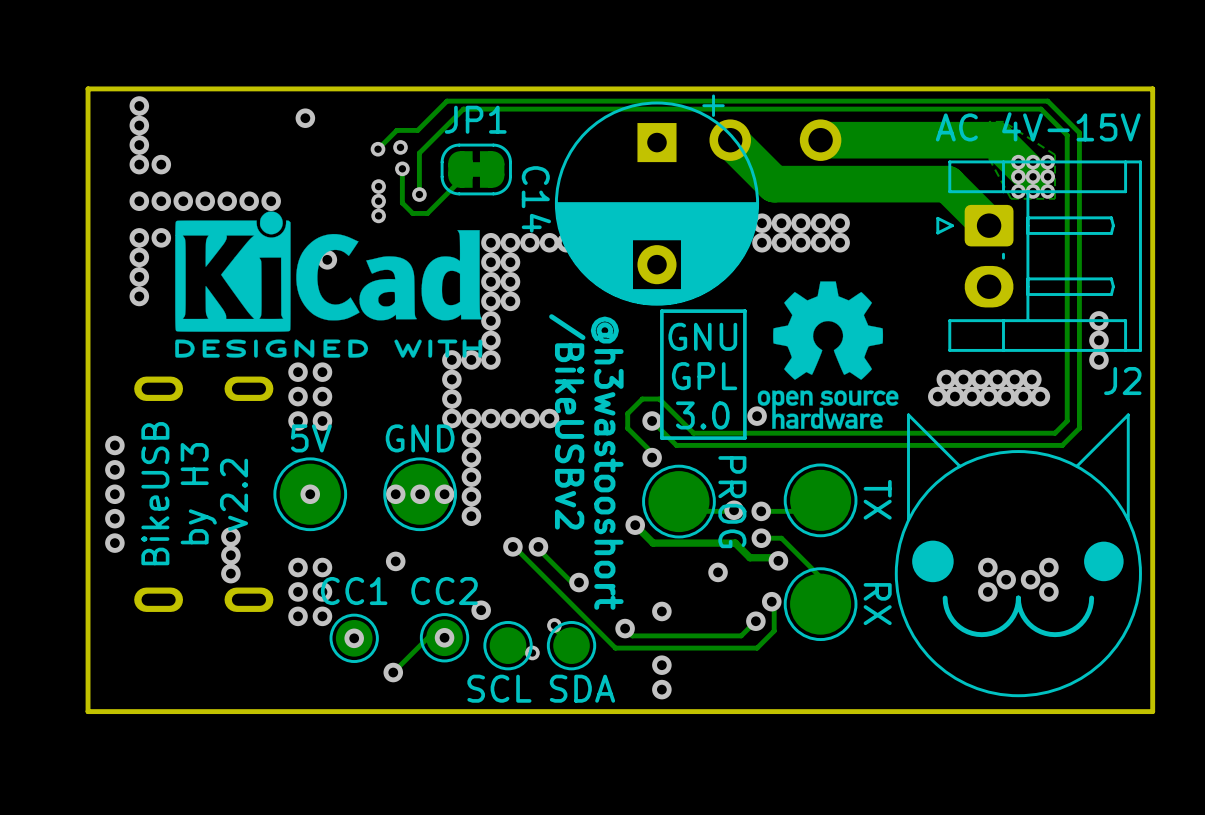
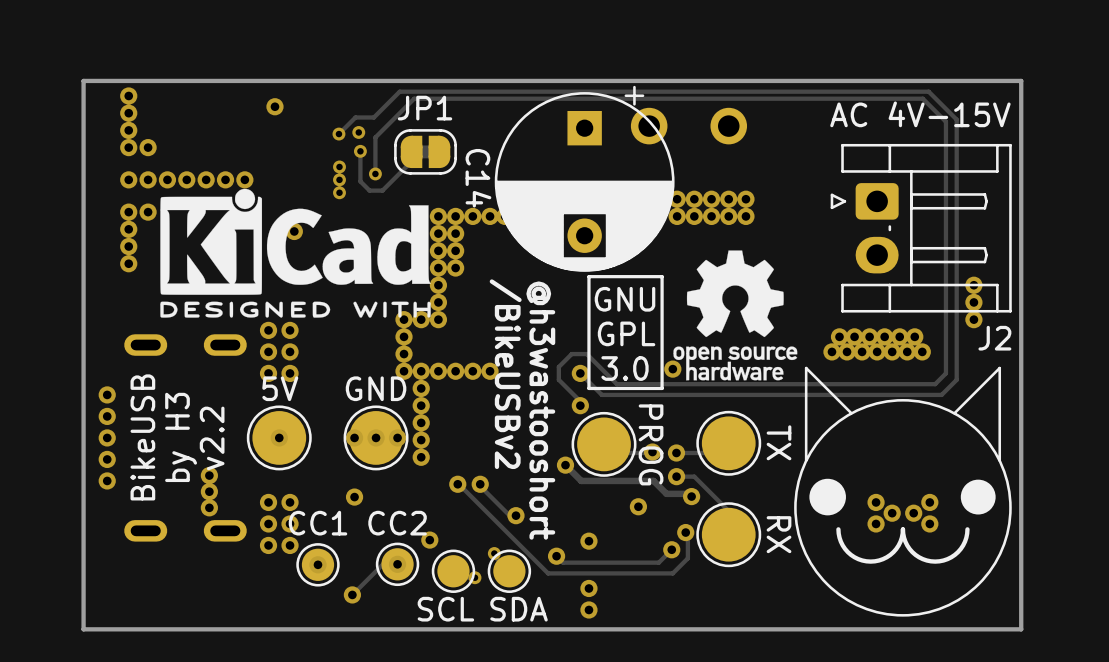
zone outline: (1003, 121) (1055, 154) (1055, 198) (1011, 198) (989, 158) (989, 121) (1003, 121) -> none
track: (730, 140) (774, 184) (947, 184) (989, 225) -> none
track: (820, 140) (996, 140) (1033, 176) -> none
via: (1018, 162) -> none
via: (1033, 162) -> none
via: (1047, 162) -> none
via: (1018, 176) -> none
via: (1033, 176) -> none
via: (1047, 176) -> none
via: (1018, 191) -> none
via: (1033, 191) -> none
via: (1047, 191) -> none

